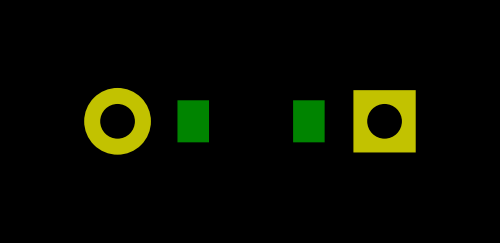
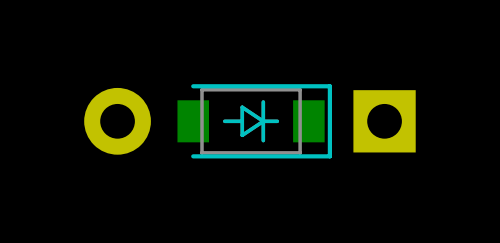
part footprint: [84, 87, 416, 155] -> [84, 84, 416, 159]

